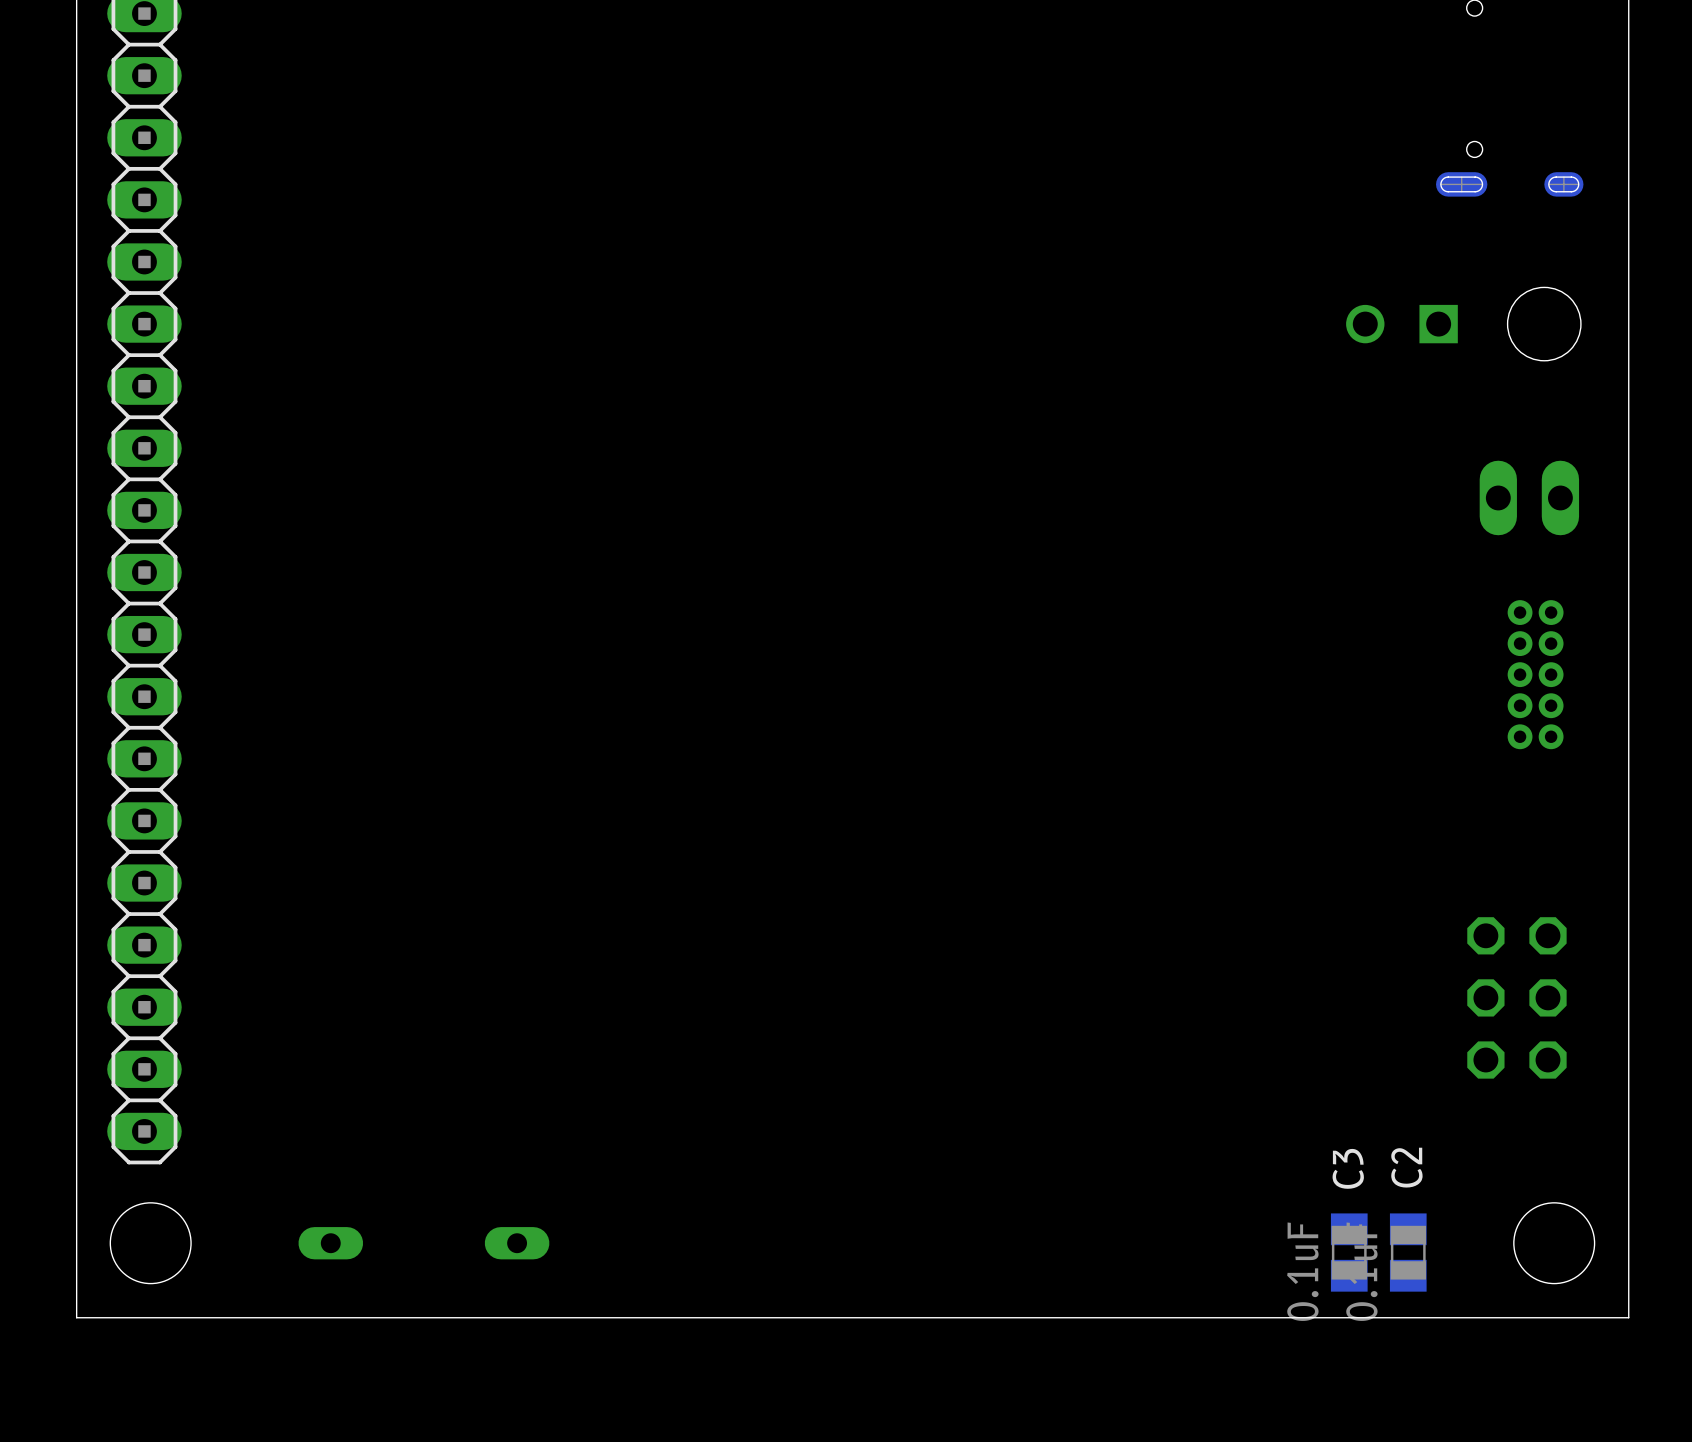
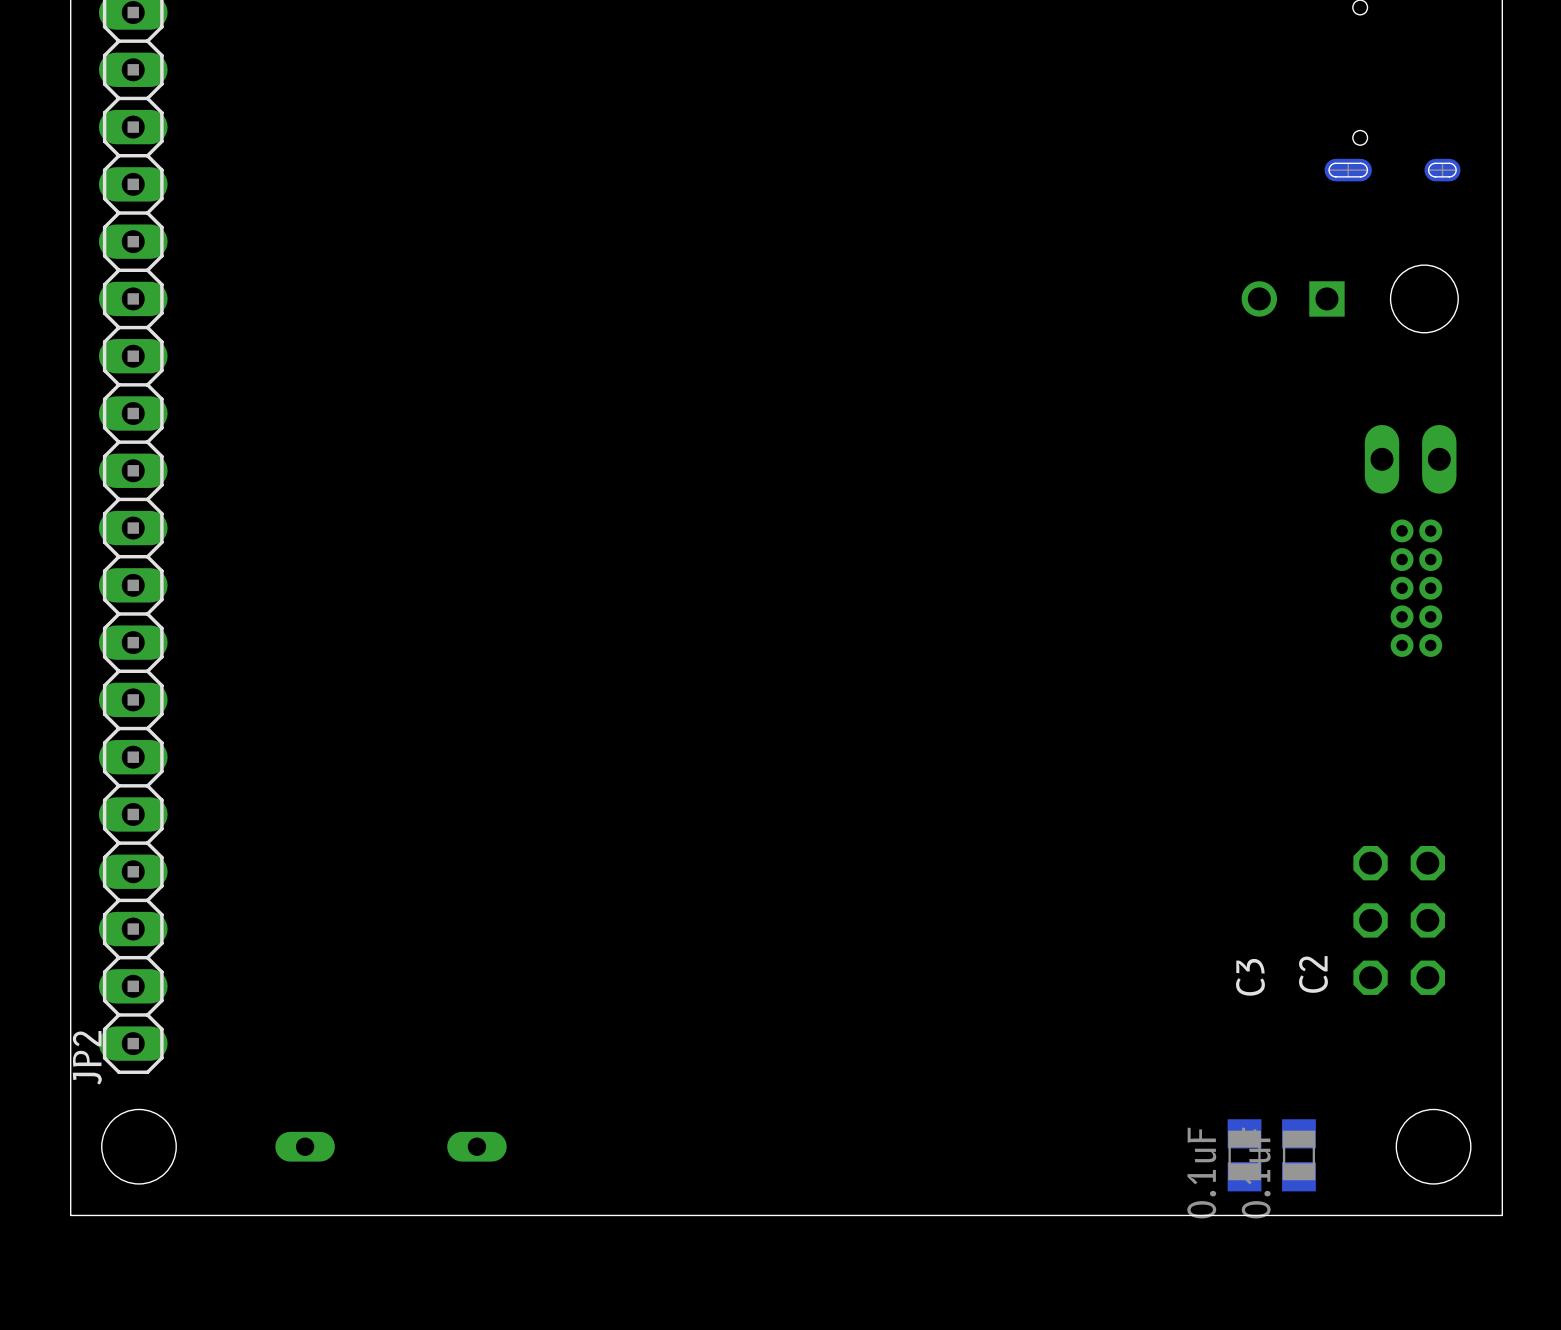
part position: (1535, 674) -> (1416, 588)
JP2 name: none -> JP2 (87, 1057)
C2 name position: C2 (1406, 1167) -> C2 (1313, 974)
C3 name position: C3 (1348, 1168) -> C3 (1250, 977)

